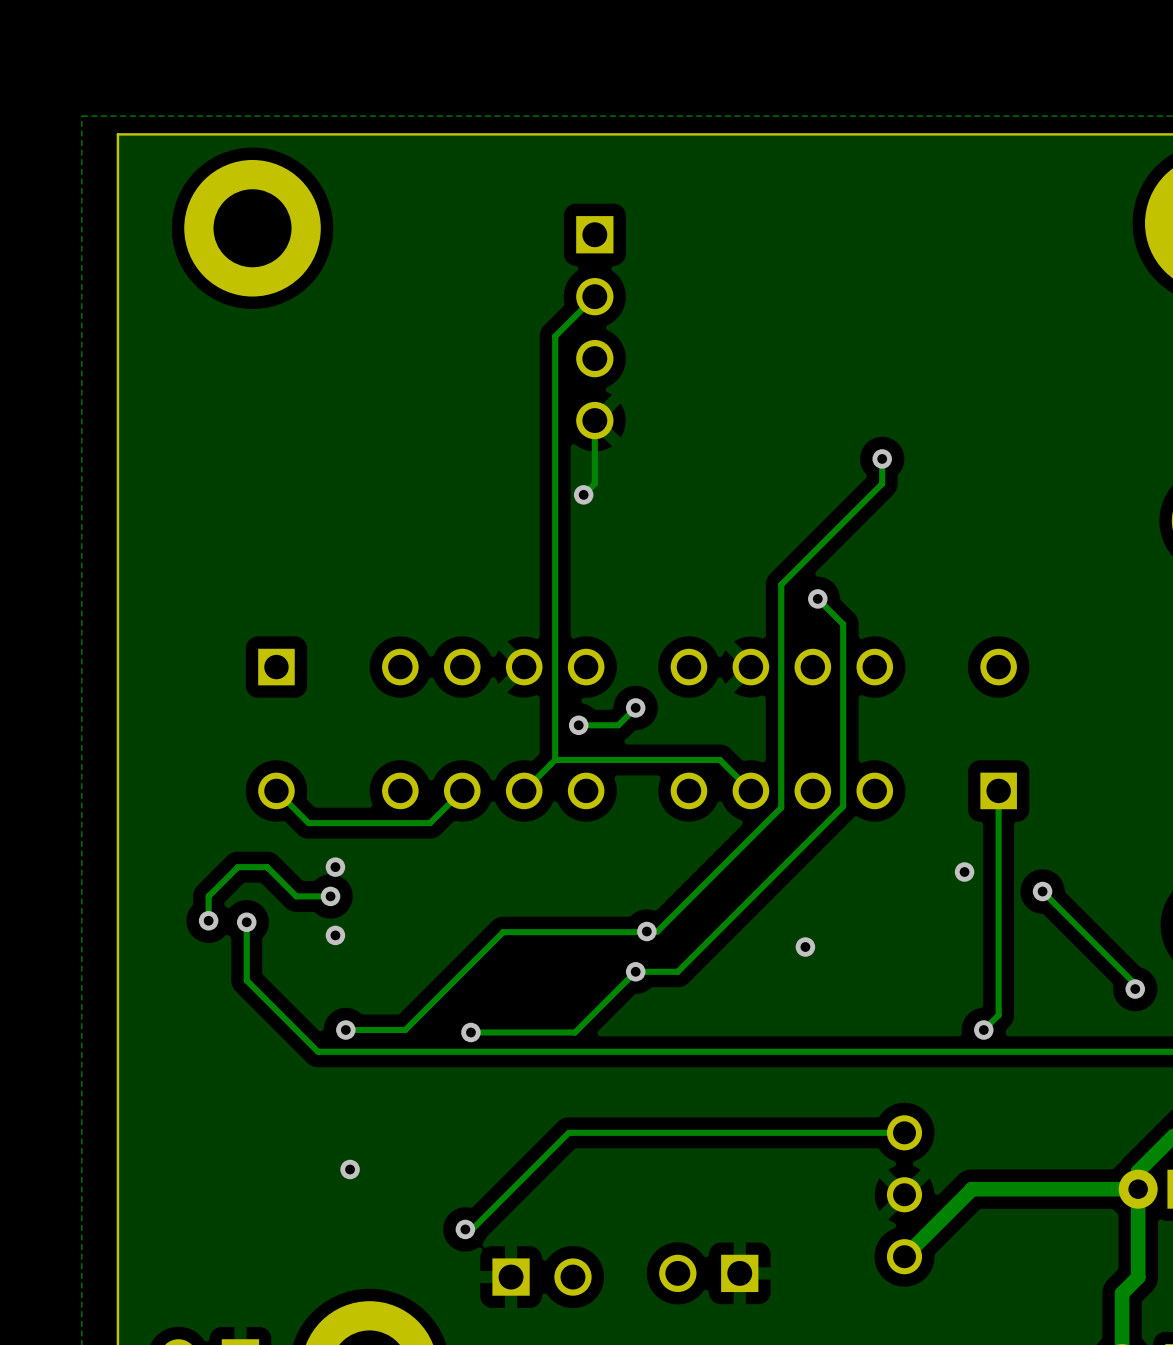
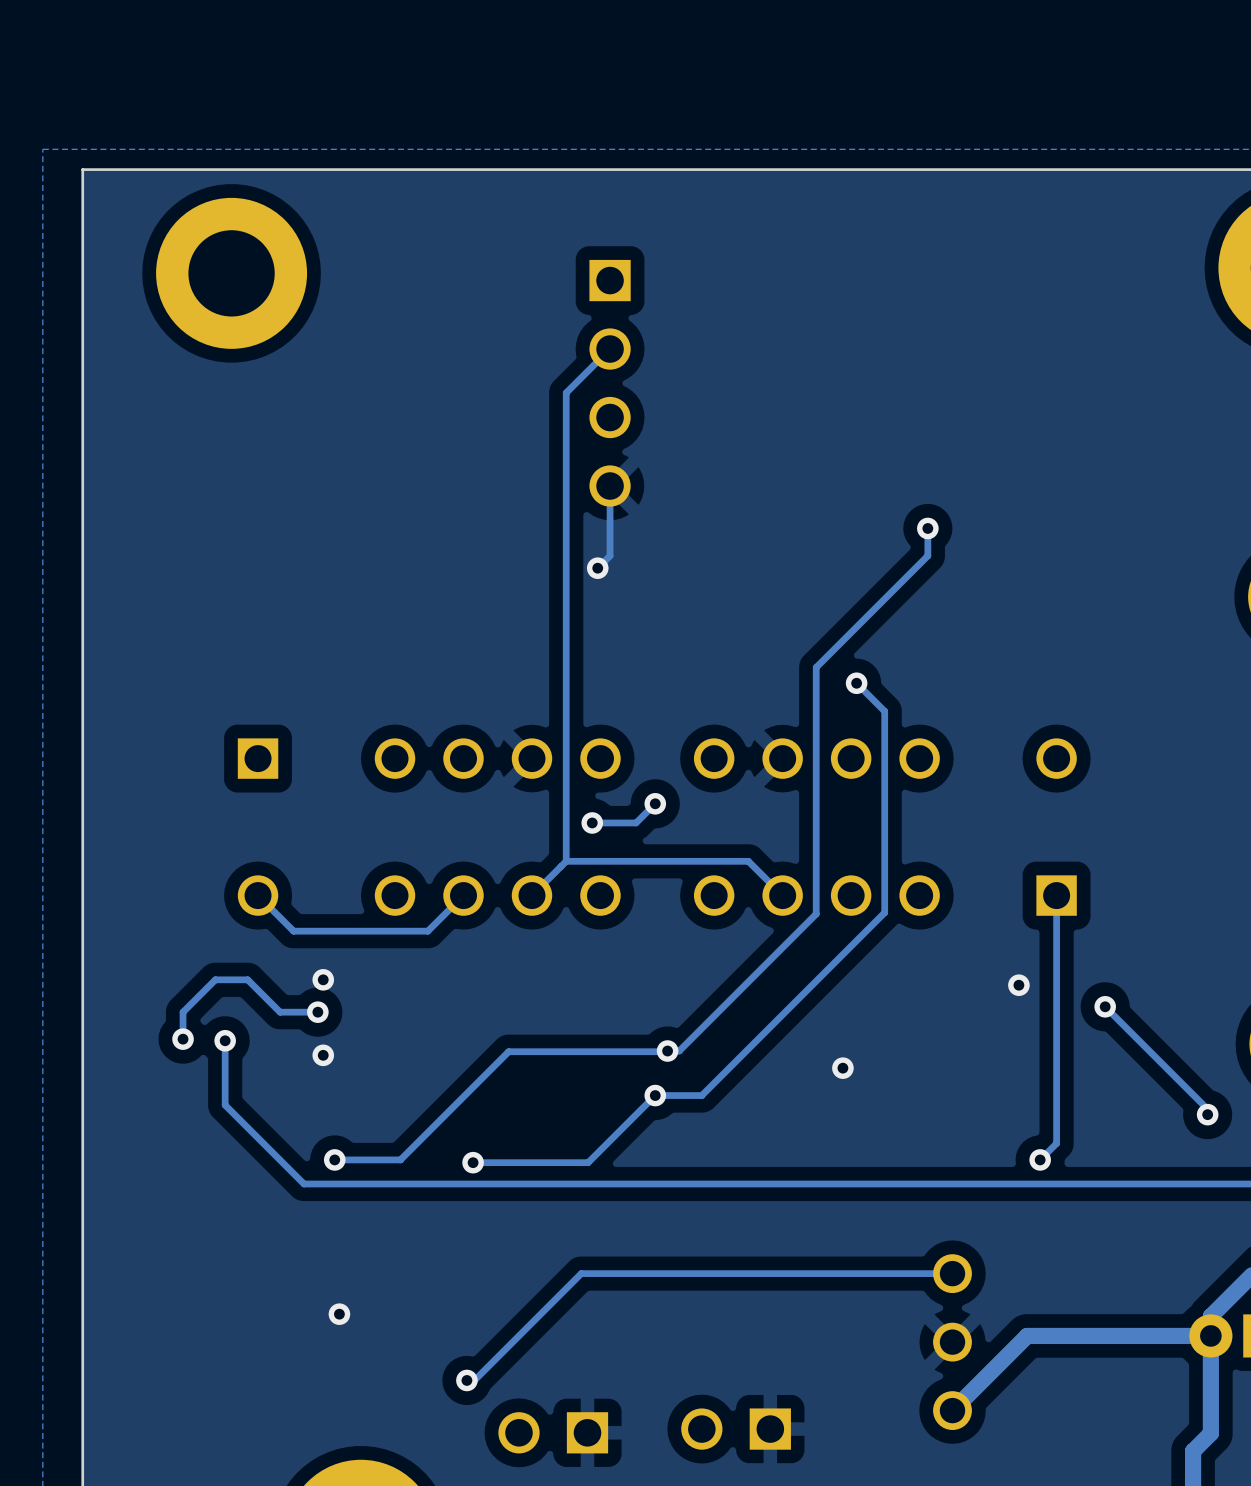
part rotation: 0° (542, 1277) -> 180° (553, 1432)

